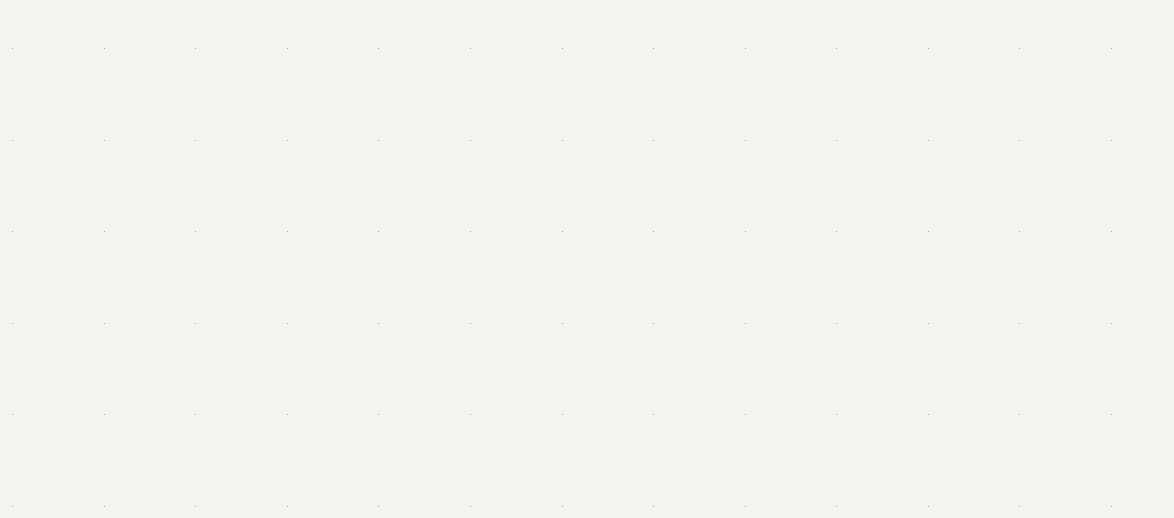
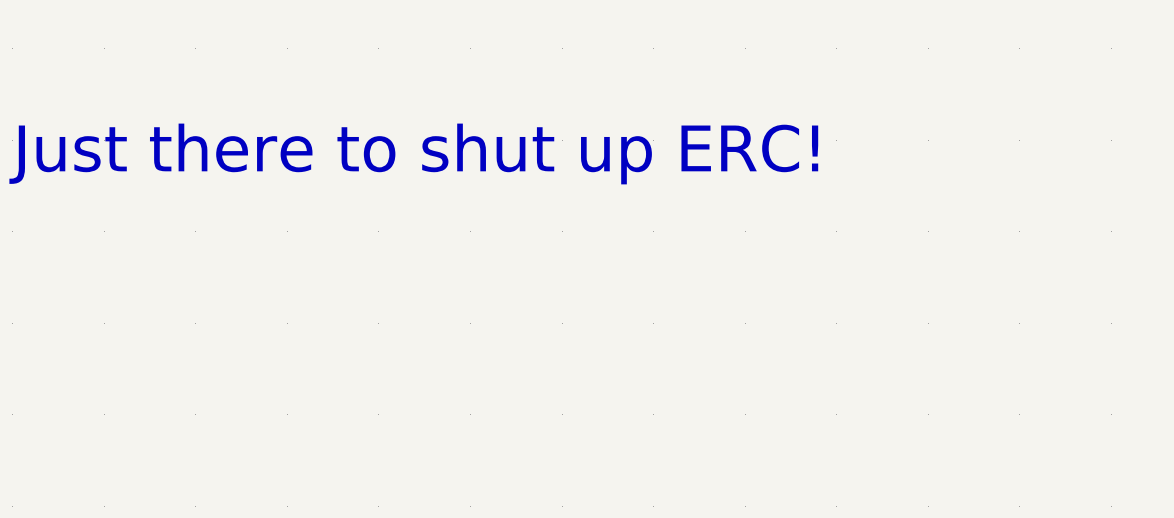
text: none -> Just there to shut up ERC! (413, 153)

